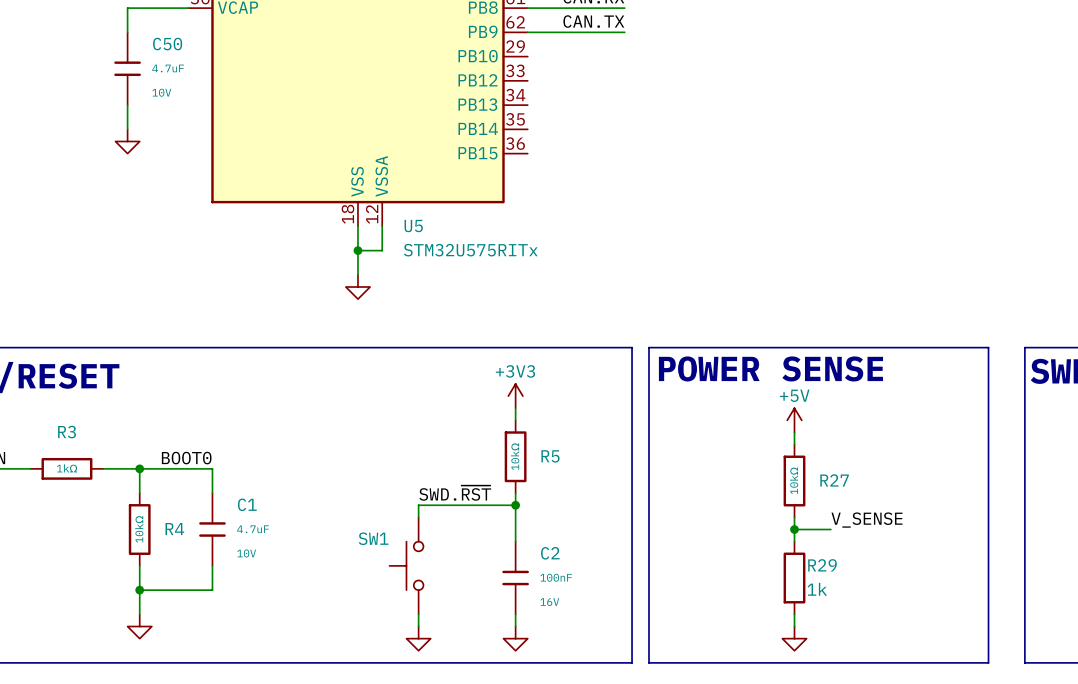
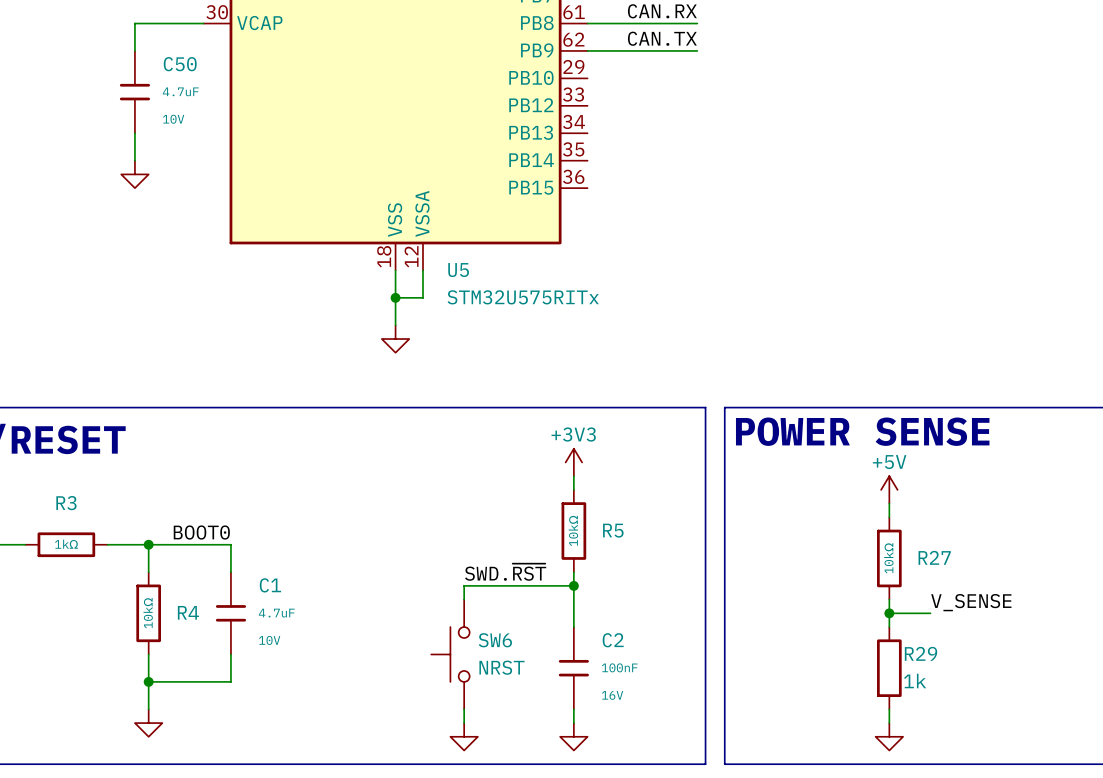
SW1 name: SW1 (373, 538) -> SW6 (495, 640)
SW1 value: none -> NRST (501, 667)

